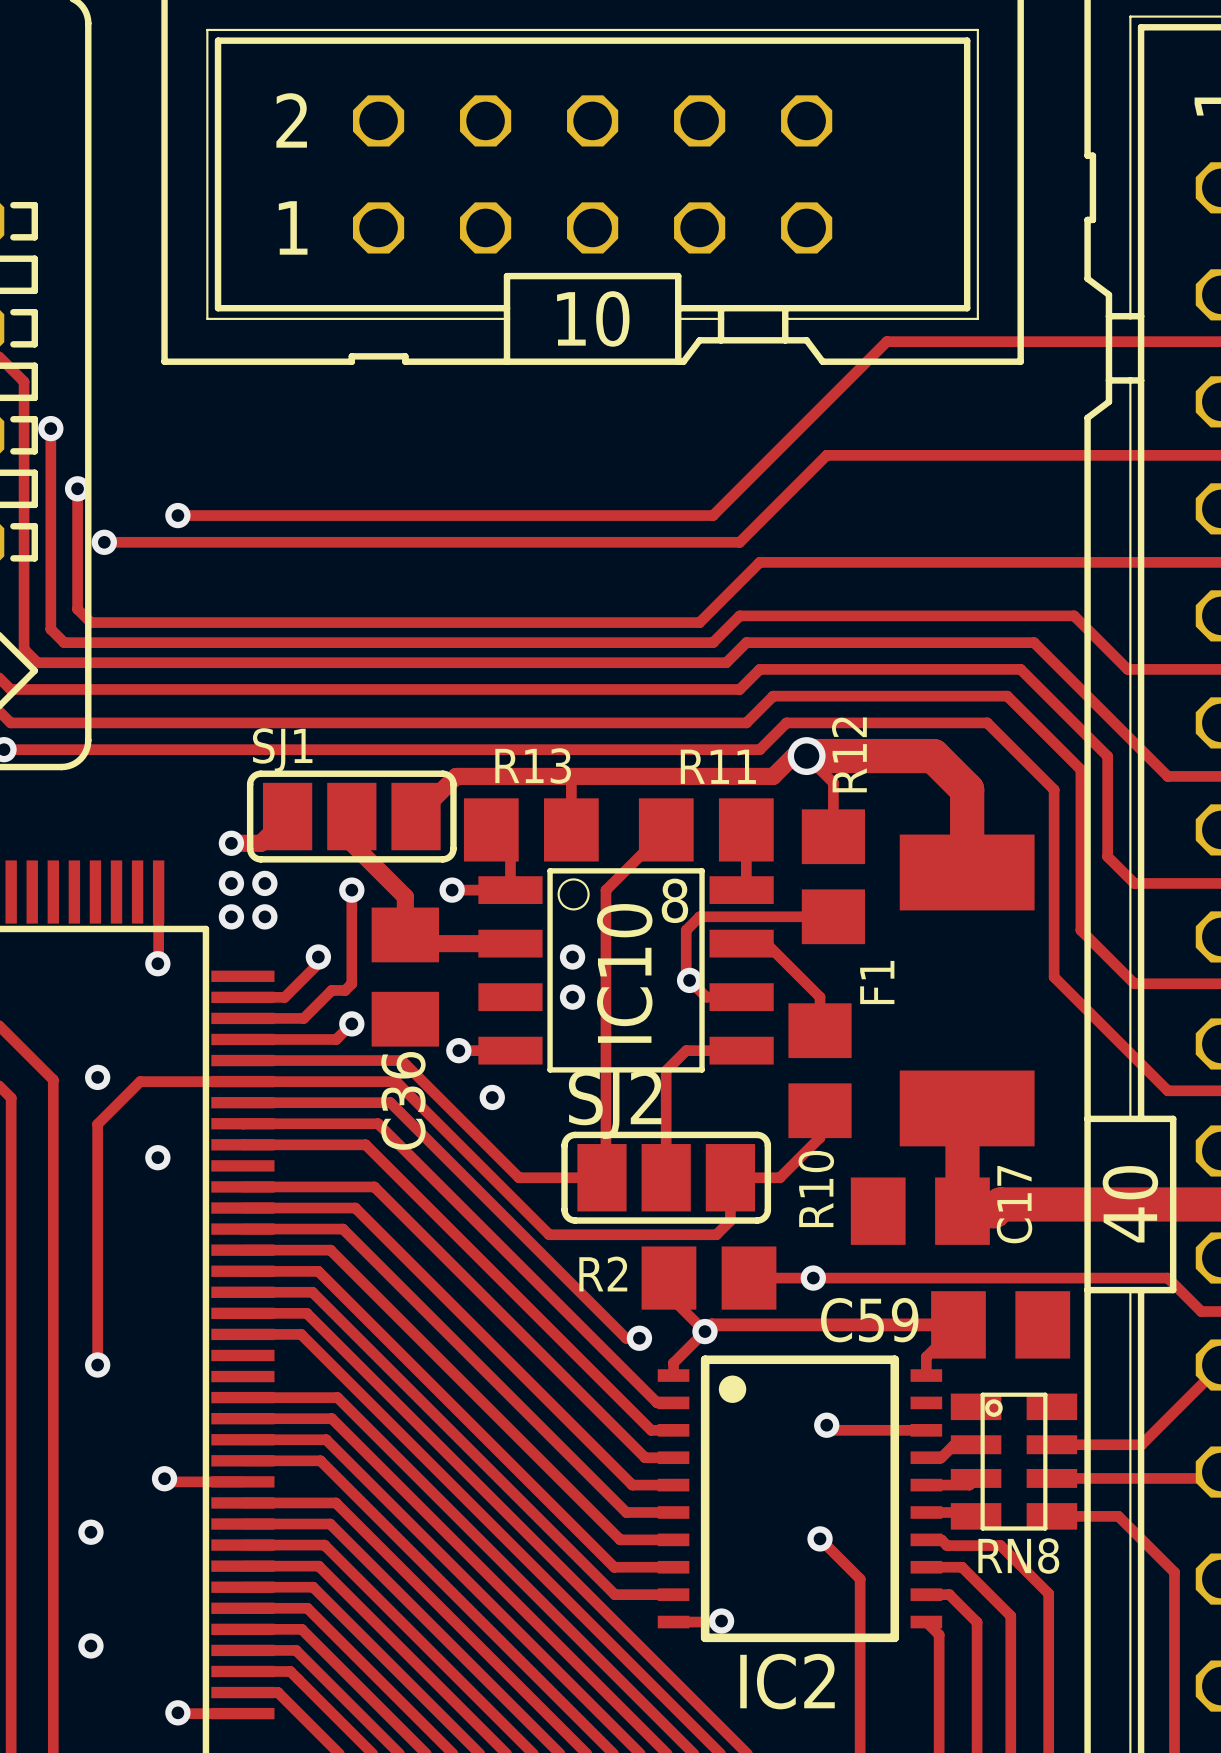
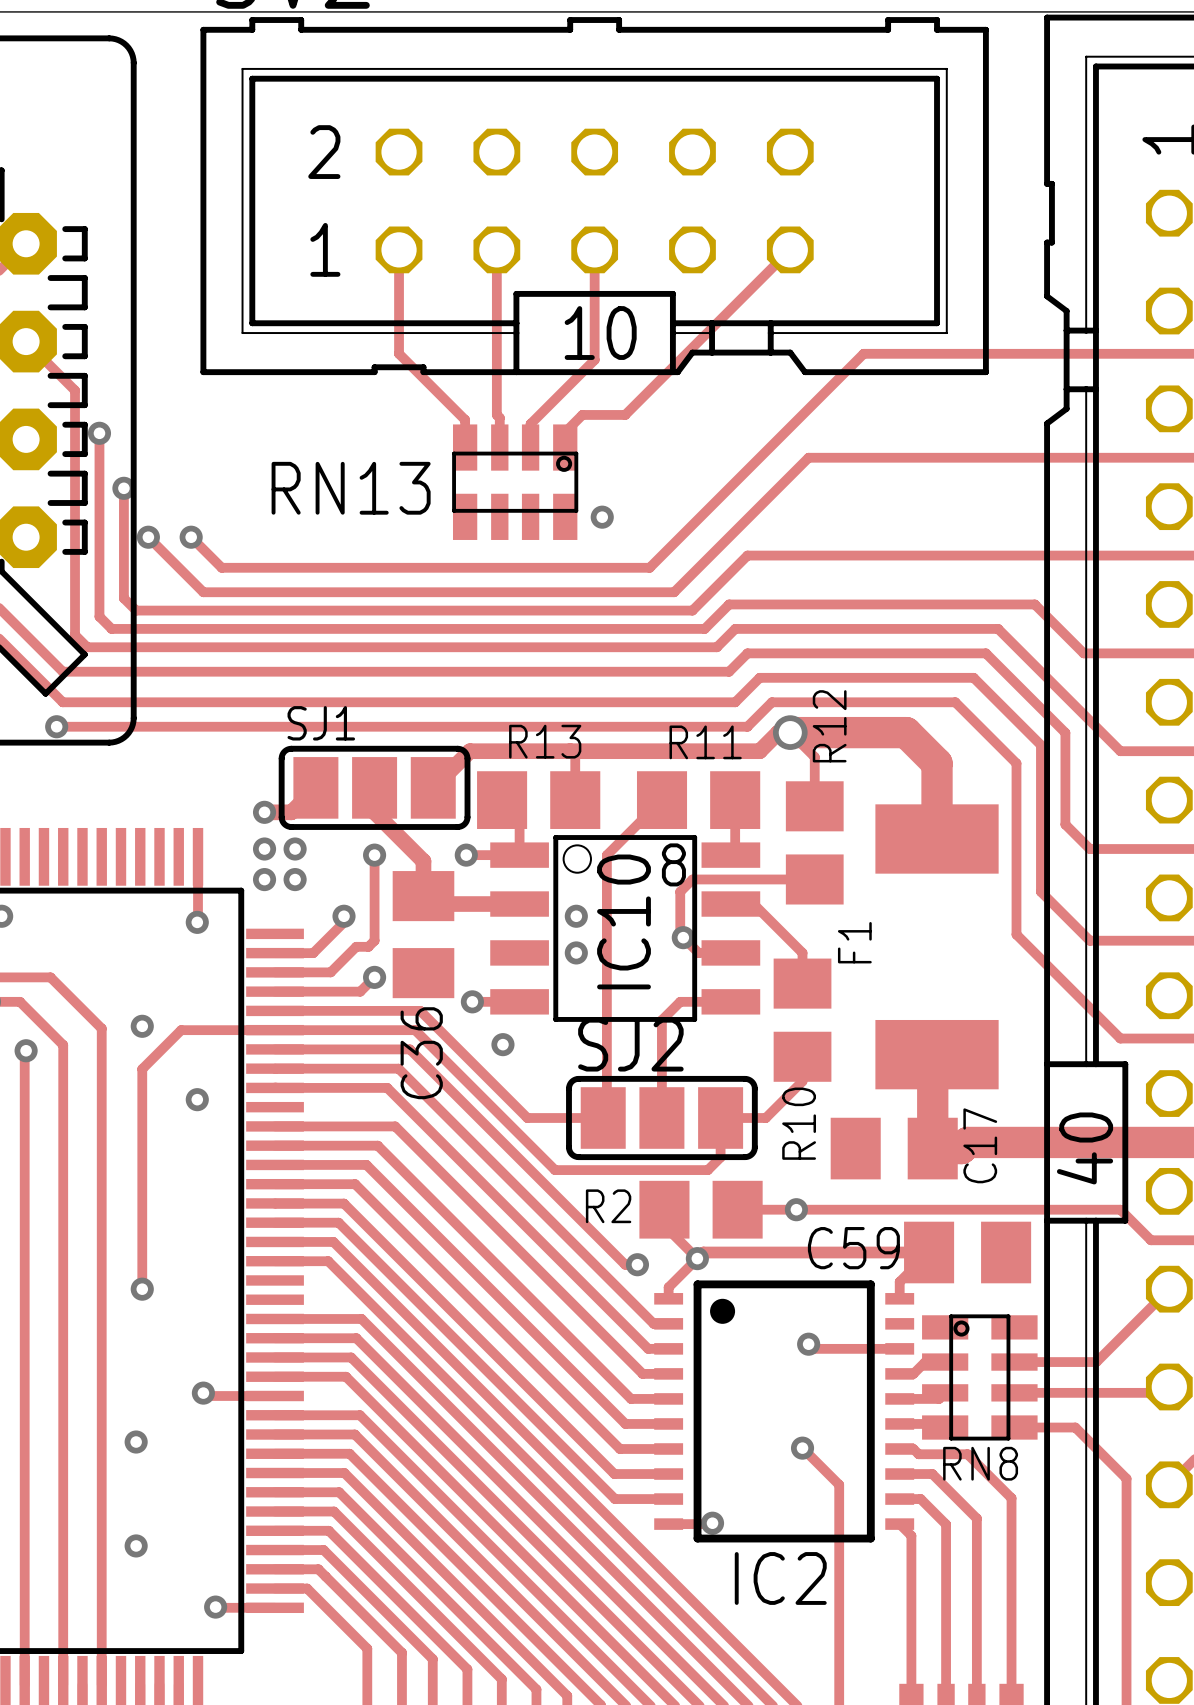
track: none -> (399, 249) (399, 353) (465, 419) (465, 447)
track: none -> (496, 249) (496, 414) (499, 417) (499, 447)
track: none -> (594, 249) (594, 359) (530, 424) (530, 447)
track: none -> (790, 249) (625, 414) (582, 414) (565, 432) (565, 447)
RN13: none -> (515, 482)
track: (177, 515) (713, 515) -> (191, 537) (221, 567) (649, 567) (704, 512)
via position: (177, 515) -> (191, 537)
via: none -> (602, 517)
track: (104, 542) (739, 542) -> (148, 537) (203, 592) (674, 592) (729, 537)

